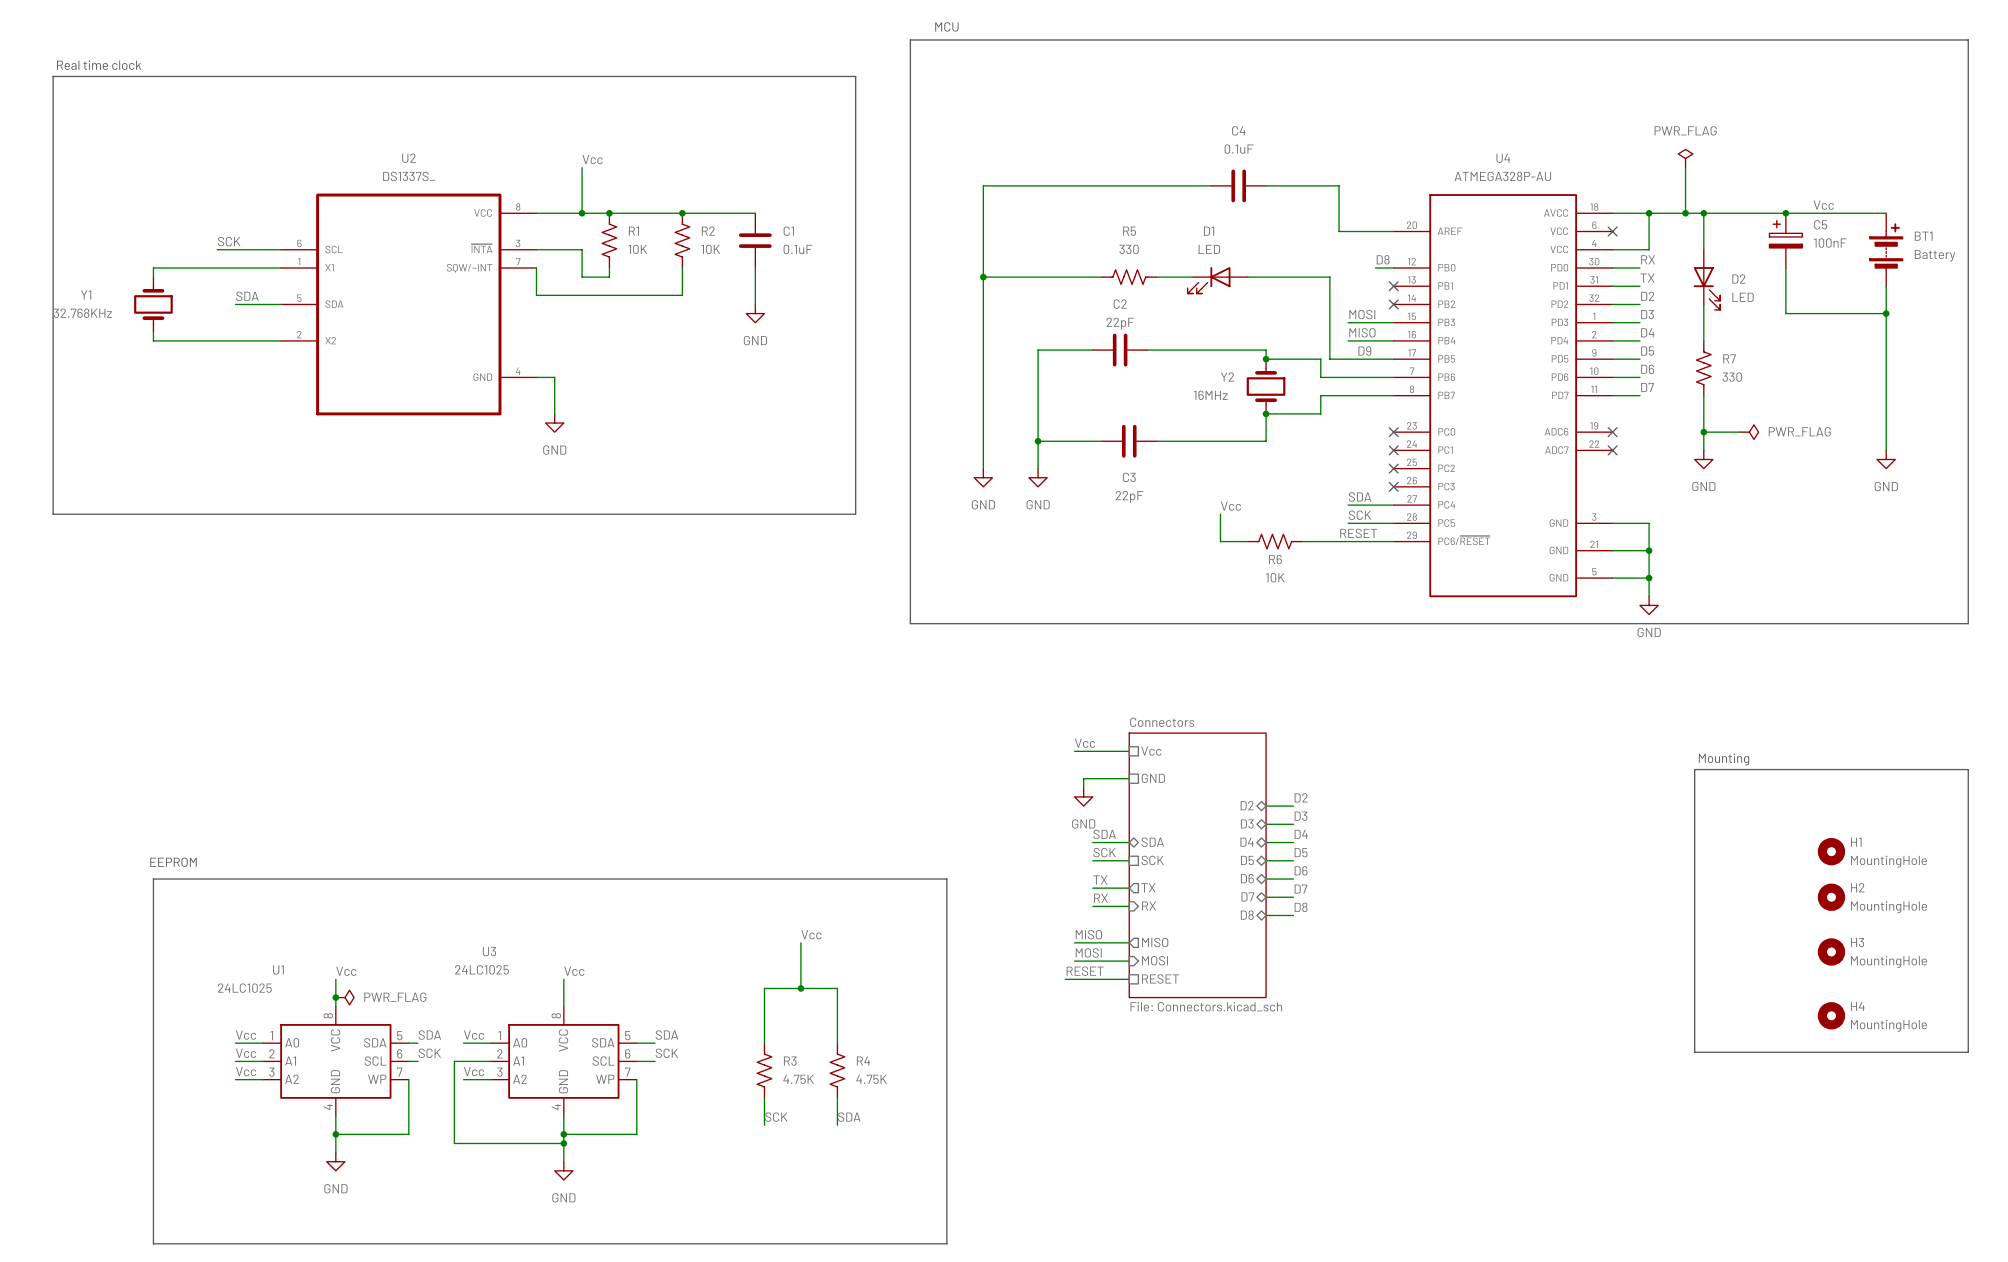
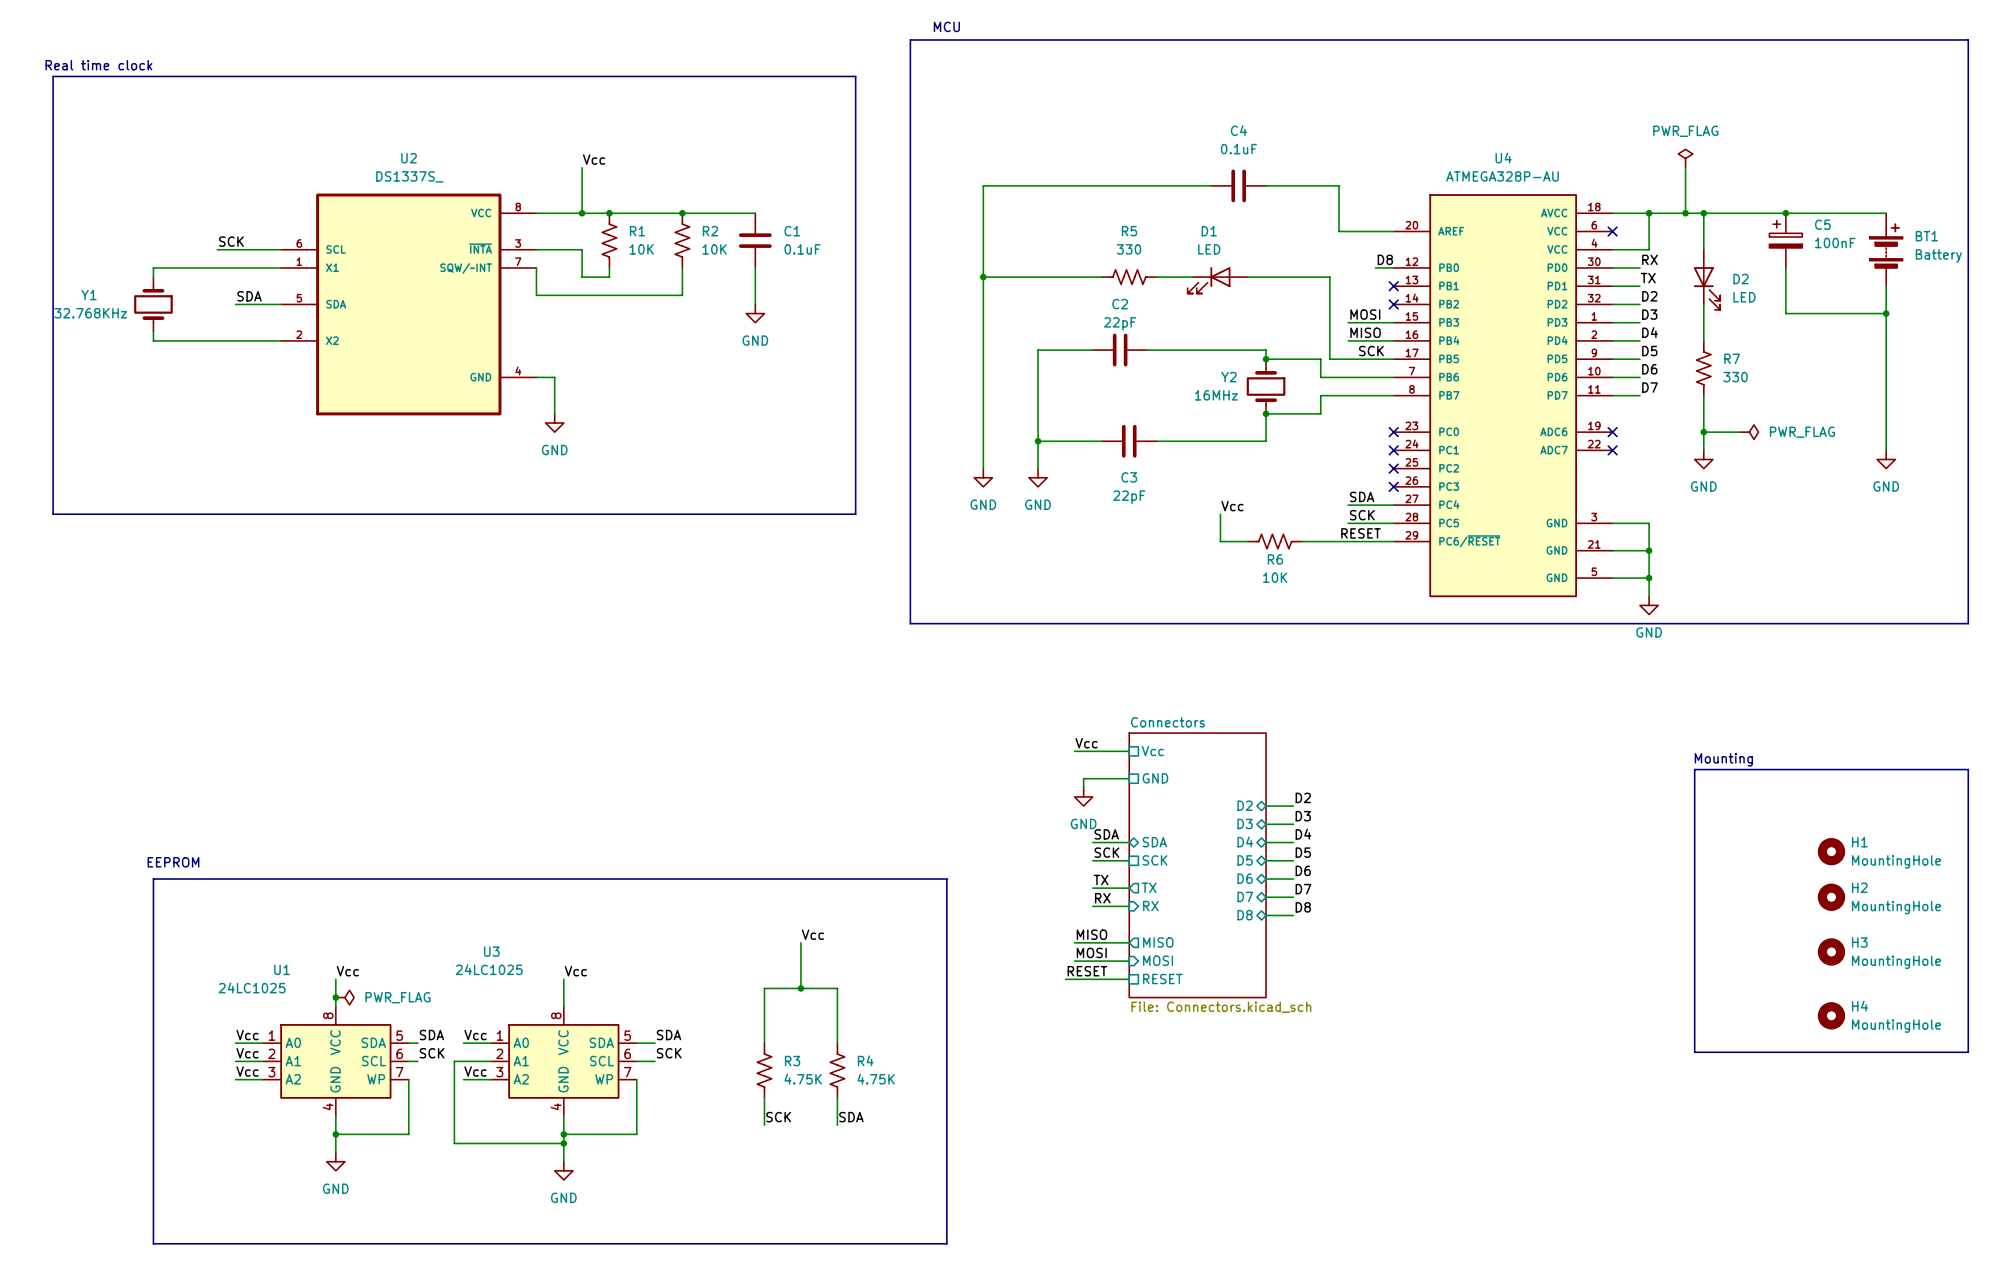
label: Vcc (1823, 205) -> none
label: D9 (1364, 351) -> SCK (1371, 351)

